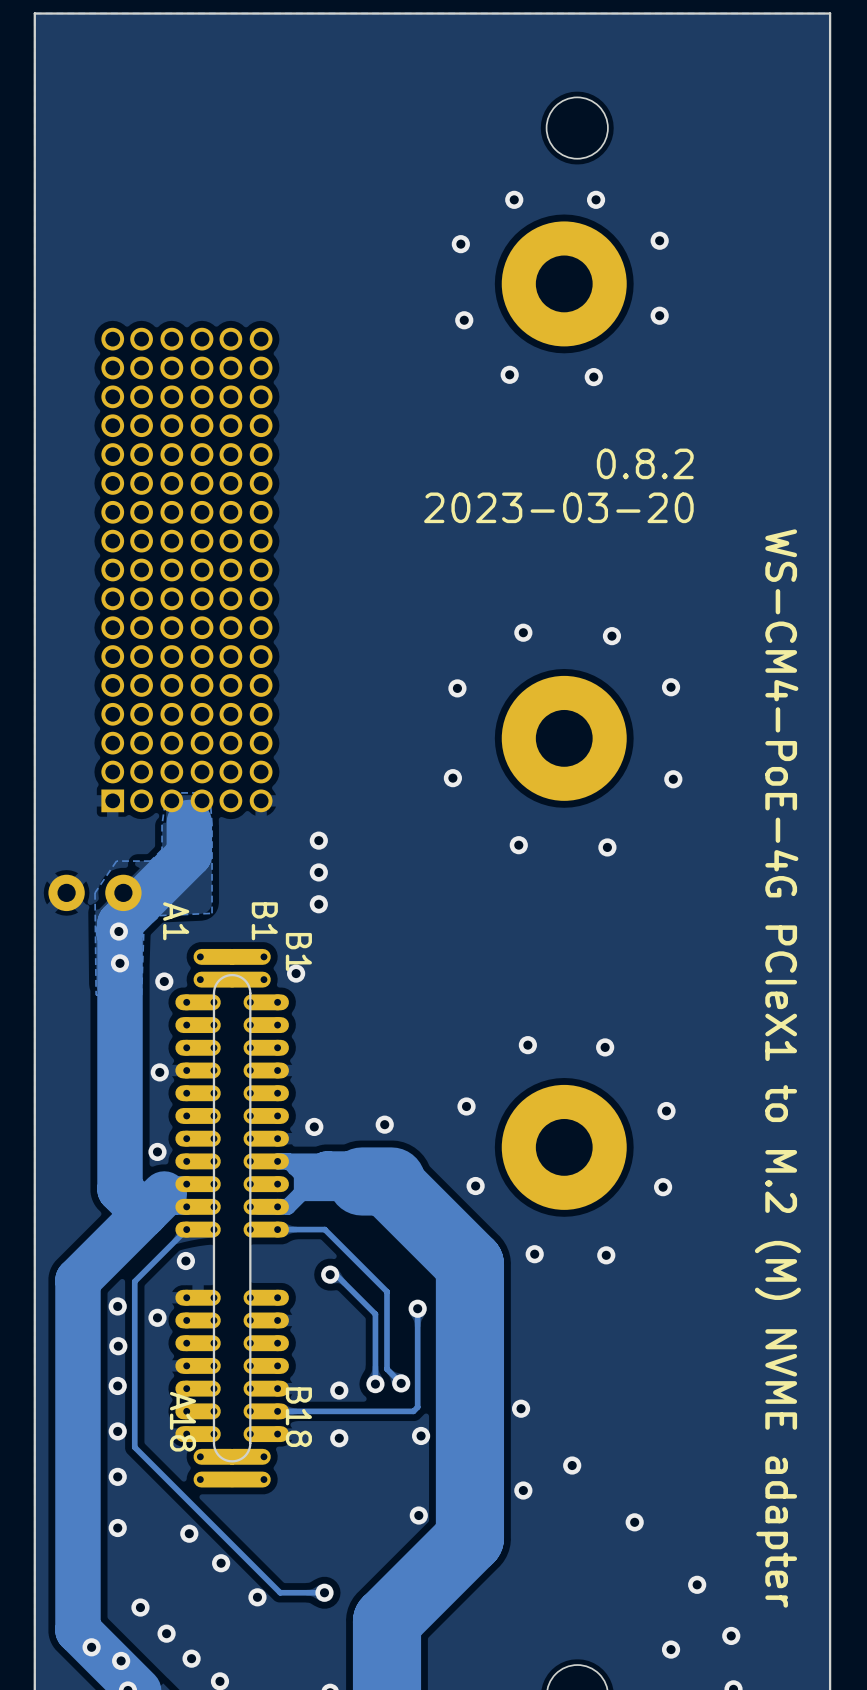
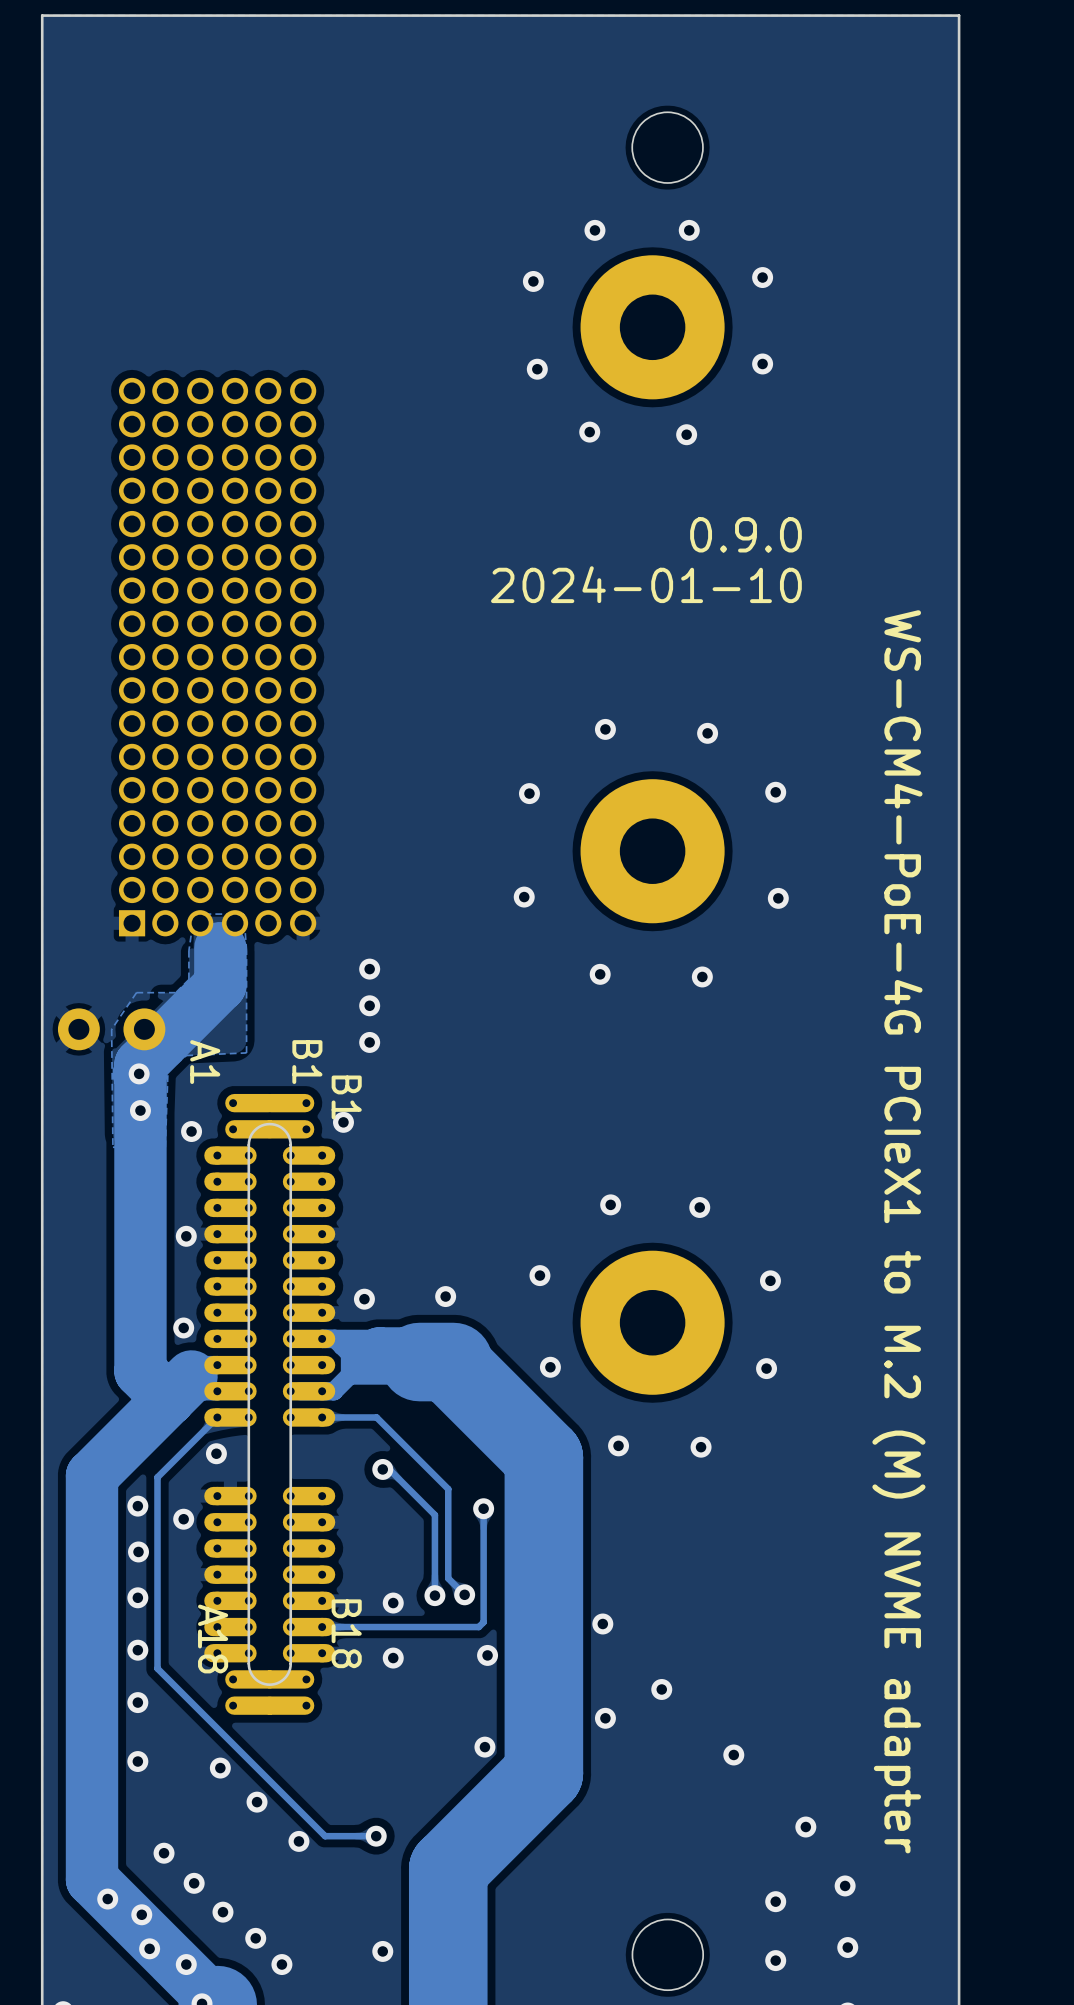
text: 0.8.2 (645, 463) -> 0.9.0 (745, 534)
text: 2023-03-20 (558, 507) -> 2024-01-10 (646, 584)

